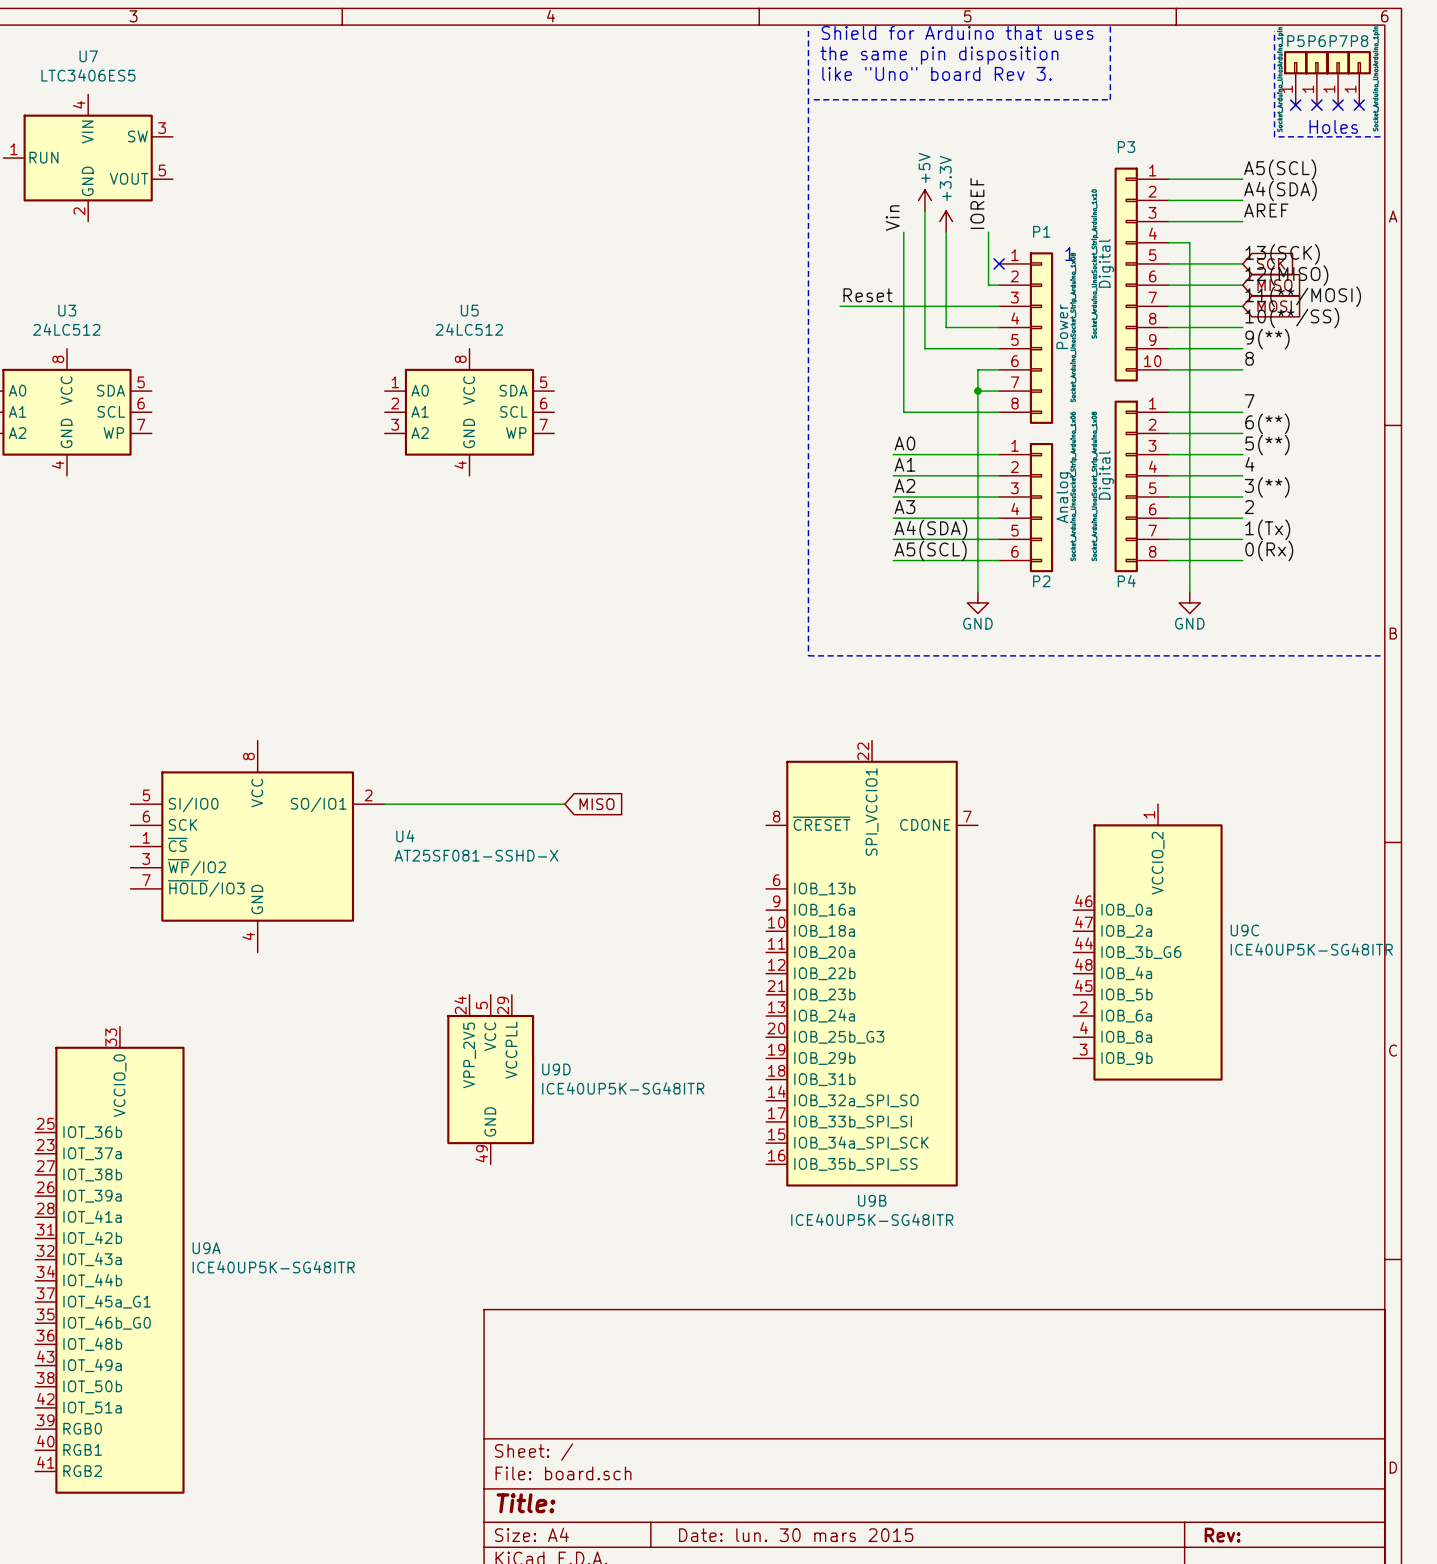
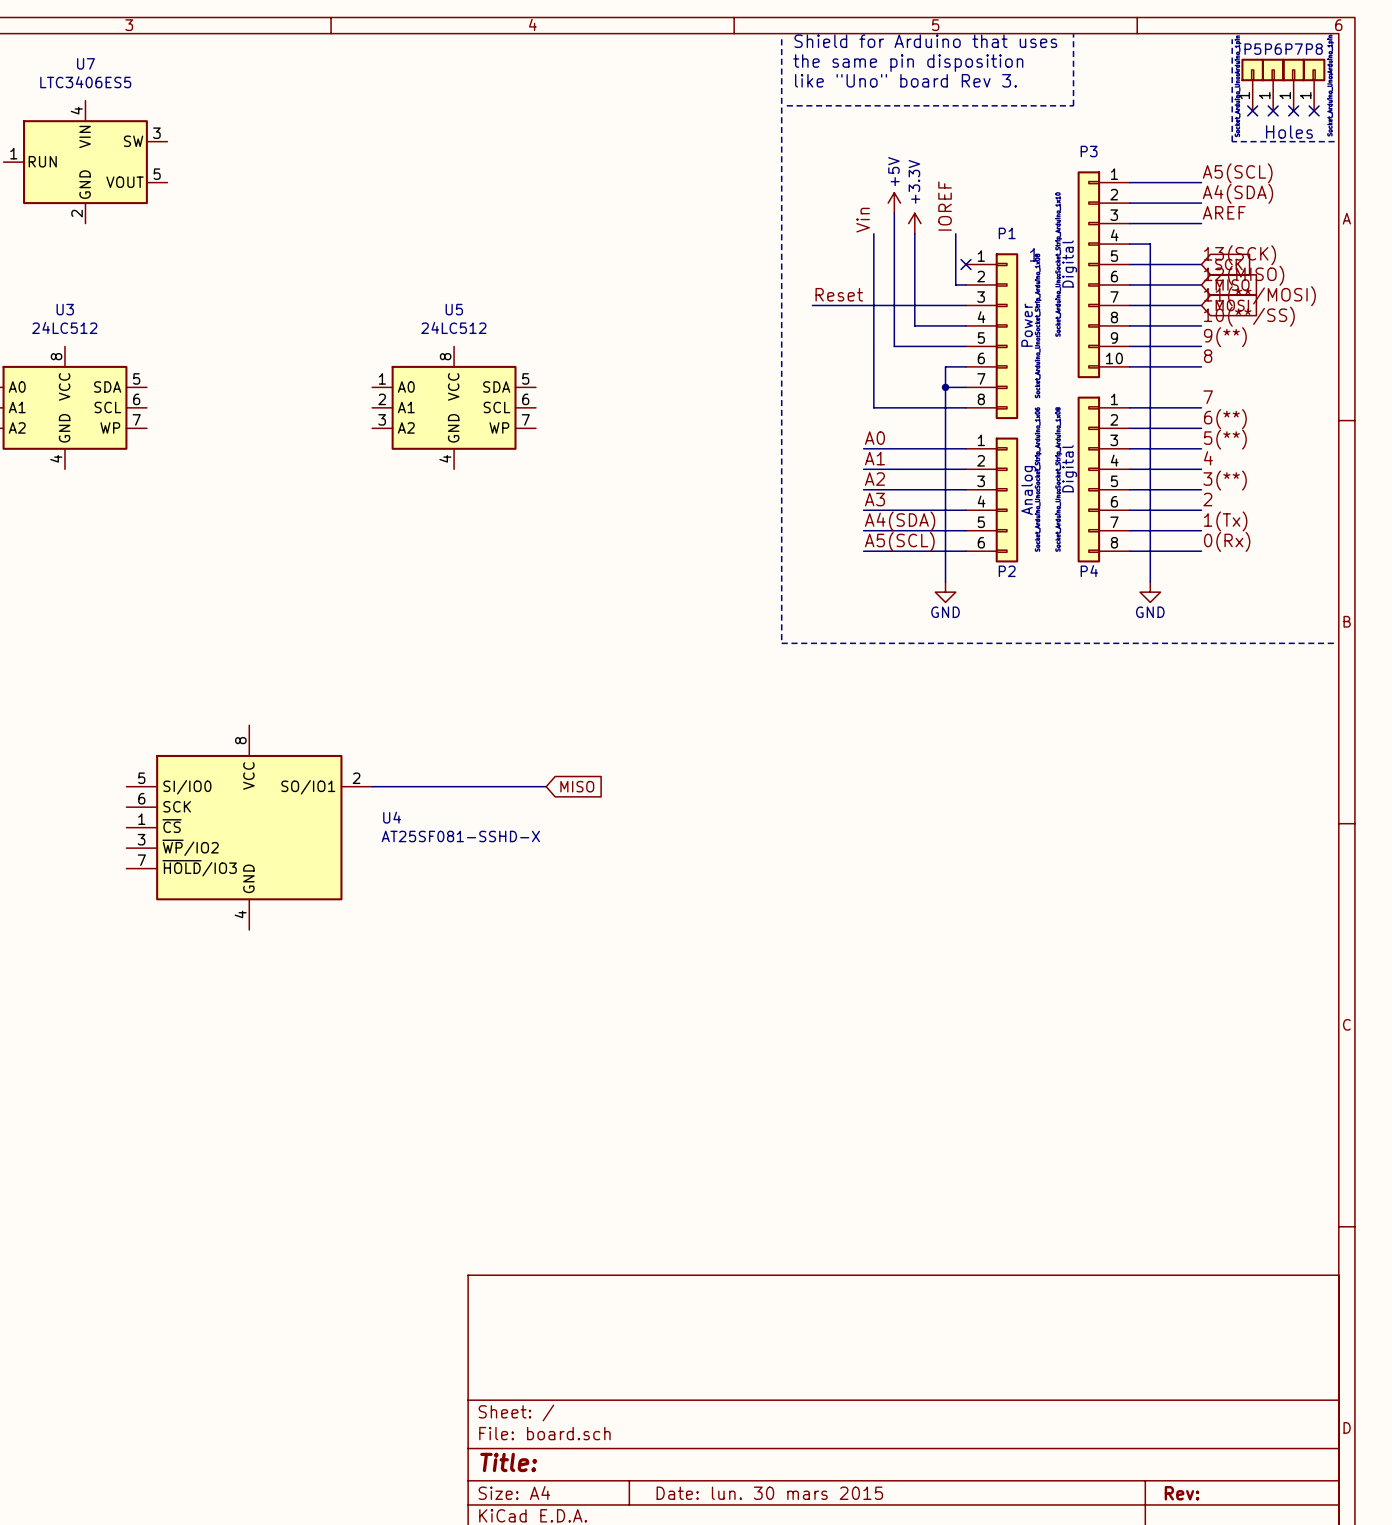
U9C: ICE40UP5K-SG48ITR (1147, 942) -> none
U9B: ICE40UP5K-SG48ITR (872, 963) -> none
U9D: ICE40UP5K-SG48ITR (490, 1079) -> none
U9A: ICE40UP5K-SG48ITR (109, 1260) -> none

